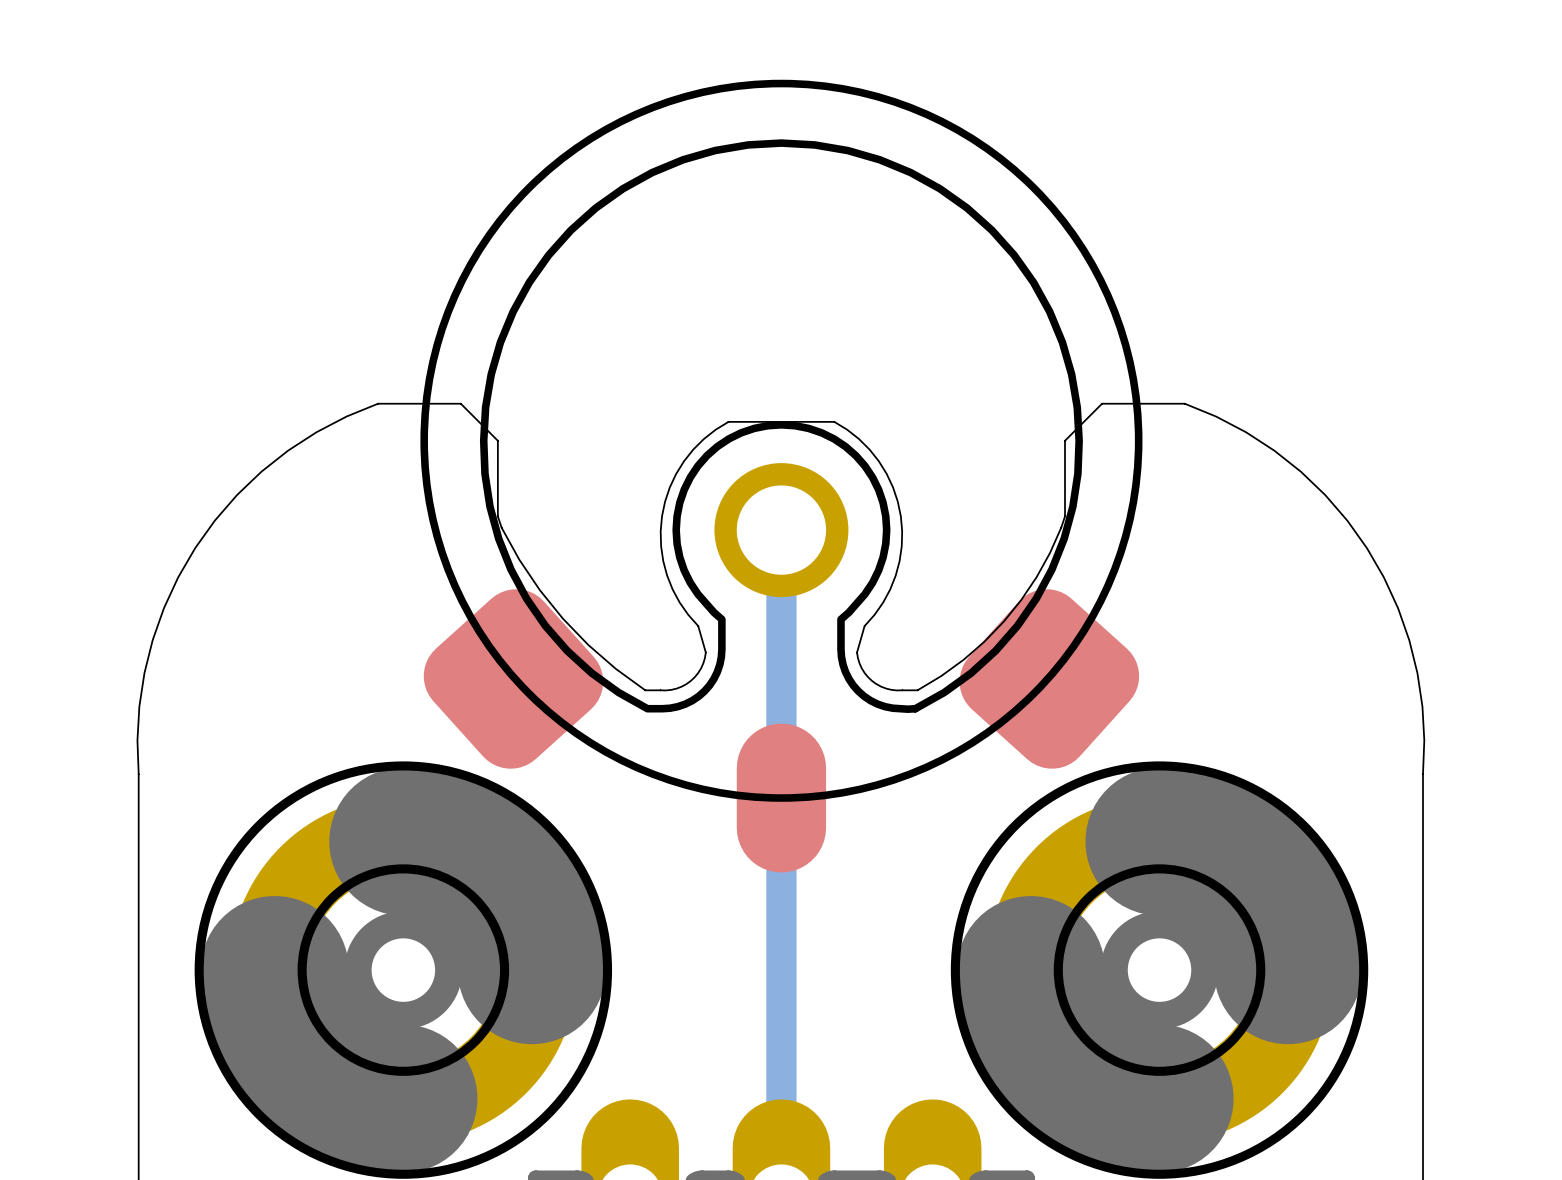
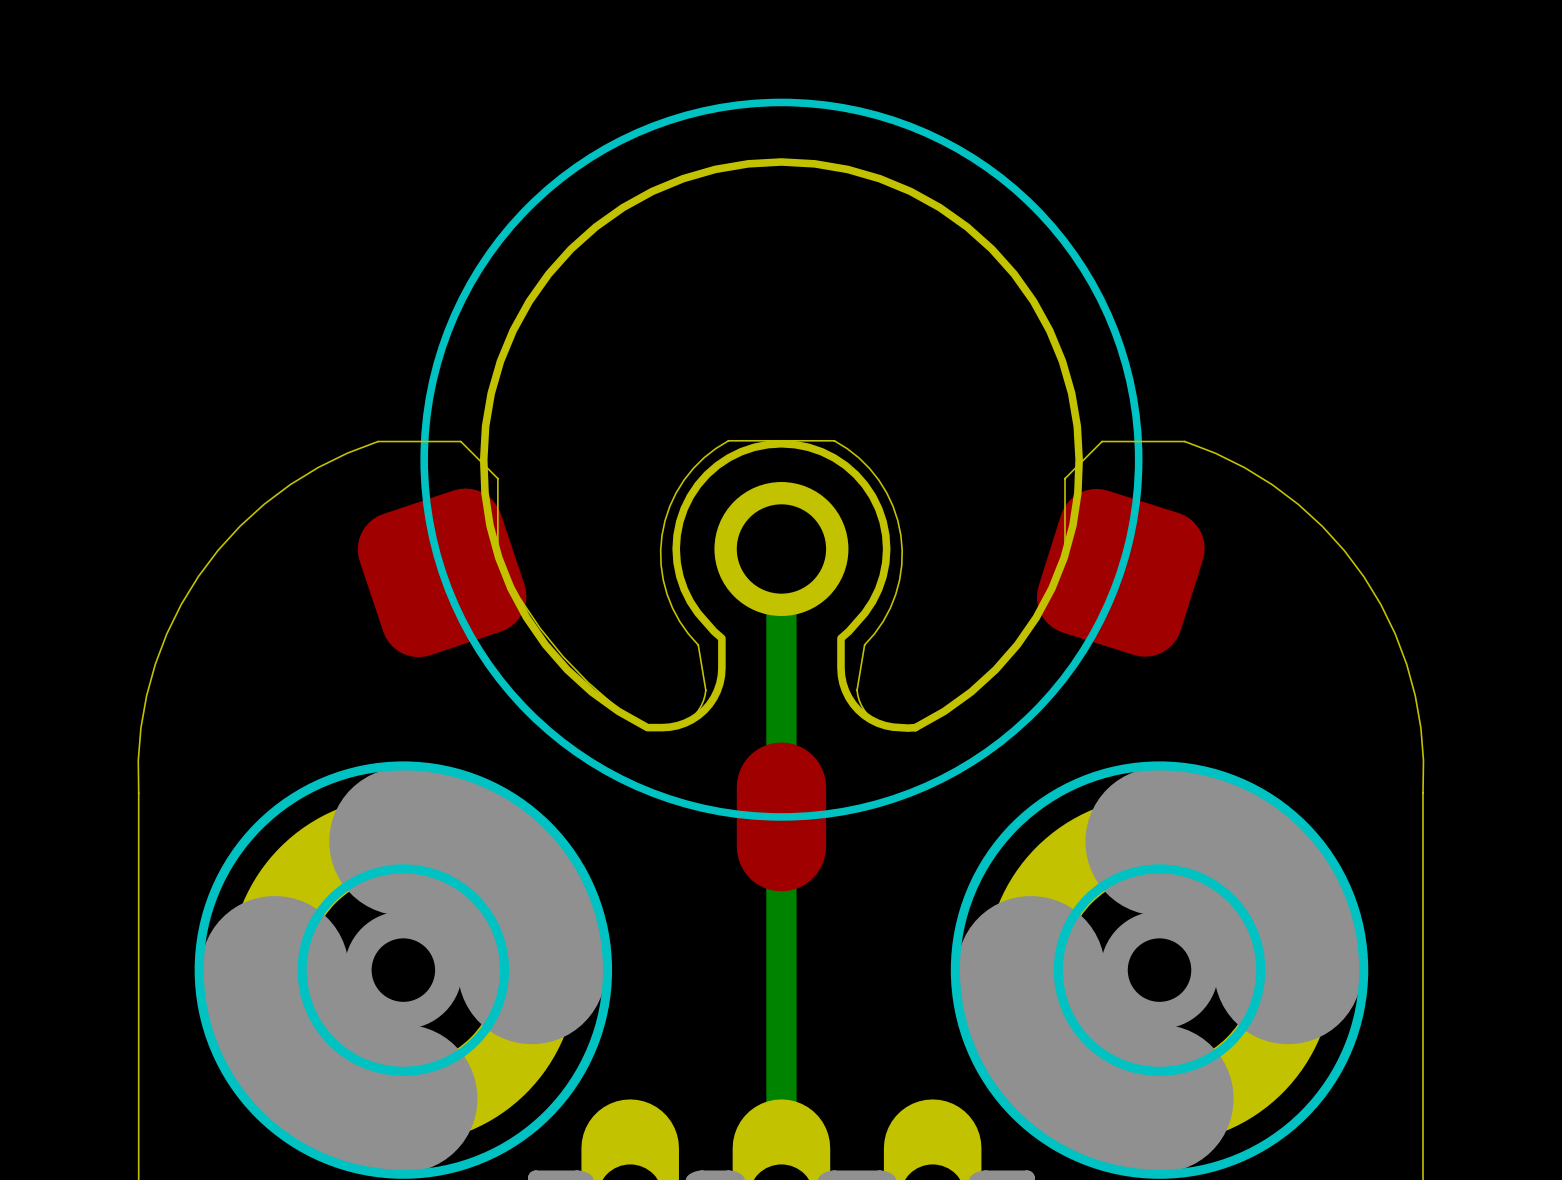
part footprint: [420, 79, 1143, 873] -> [357, 98, 1205, 892]
board edge: (497, 478) (497, 440) (460, 403) (378, 403) (346, 416) (316, 432) (288, 450) (261, 471) (237, 494) (214, 520) (195, 548) (178, 577) (163, 608) (152, 640) (144, 673) (139, 706) (137, 740) (138, 793) -> (497, 478) (460, 441) (378, 441) (347, 453) (318, 467) (290, 484) (264, 504) (240, 526) (218, 550) (198, 576) (181, 604) (166, 633) (155, 664) (146, 695) (140, 727) (138, 760) (138, 793)
board edge: (1065, 478) (1065, 440) (1102, 403) (1184, 403) (1216, 416) (1246, 432) (1274, 450) (1300, 471) (1325, 495) (1347, 520) (1367, 548) (1384, 577) (1398, 608) (1409, 640) (1417, 673) (1422, 706) (1424, 740) (1422, 793) -> (1065, 478) (1102, 441) (1184, 441) (1215, 453) (1244, 467) (1272, 484) (1298, 504) (1322, 526) (1344, 550) (1363, 576) (1380, 604) (1395, 633) (1406, 664) (1415, 695) (1420, 727) (1423, 760) (1422, 793)
board edge: (497, 516) (501, 527) (519, 559) (539, 590) (562, 618) (588, 644) (615, 668) (645, 690) (665, 690) (681, 686) (694, 677) (703, 663) (705, 652) (698, 626) (679, 602) (667, 575) (663, 561) (660, 531) (665, 501) (676, 473) (693, 449) (715, 429) (728, 421) (834, 421) (847, 429) (869, 449) (886, 473) (897, 501) (900, 516) (902, 531) (899, 561) (890, 589) (883, 602) (864, 626) (857, 652) (859, 663) (867, 677) (886, 688) (917, 690) (963, 659) (984, 641) (1021, 600) (1036, 577) (1049, 553) (1065, 516) -> (497, 516) (497, 554) (501, 565) (519, 597) (539, 627) (562, 656) (588, 682) (615, 706) (645, 728) (665, 728) (681, 724) (694, 714) (703, 700) (705, 690) (698, 644) (679, 621) (672, 608) (663, 579) (660, 550) (665, 520) (676, 492) (693, 468) (715, 448) (728, 440) (834, 440) (847, 448) (869, 468) (886, 492) (897, 520) (900, 535) (902, 550) (899, 579) (890, 608) (883, 621) (864, 644) (857, 690) (859, 700) (867, 714) (881, 724) (891, 727) (917, 728) (941, 713) (984, 679) (1003, 659) (1036, 615) (1061, 565) (1065, 554) (1065, 516)

